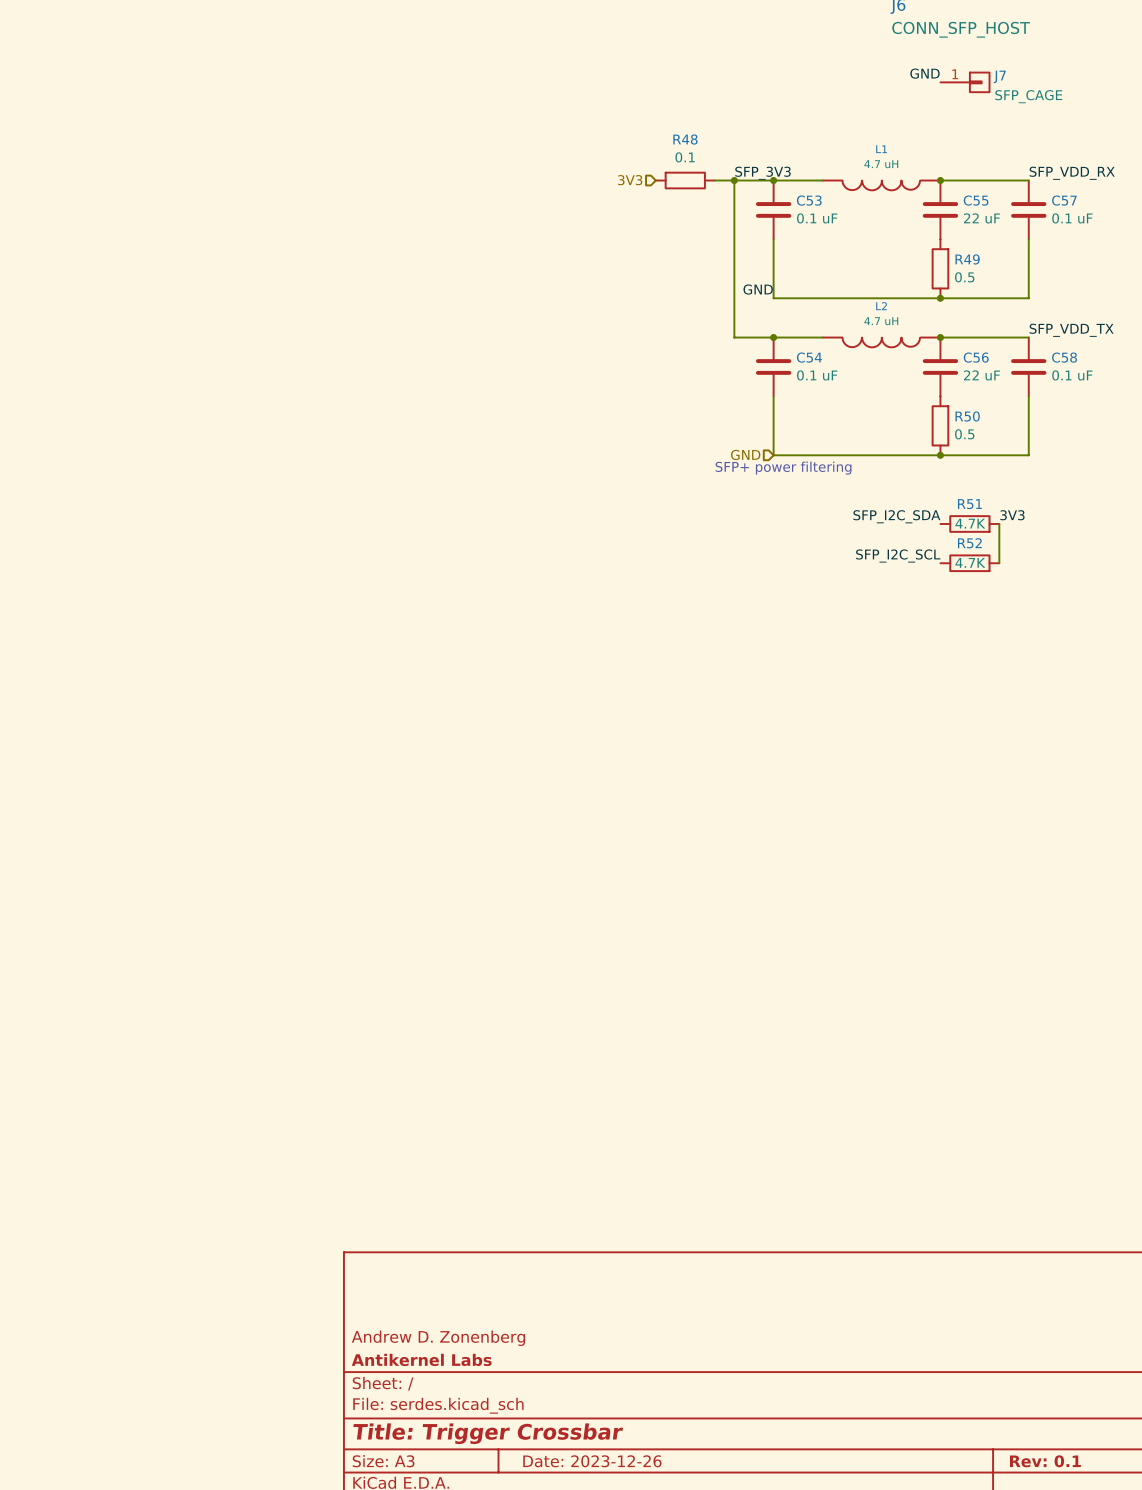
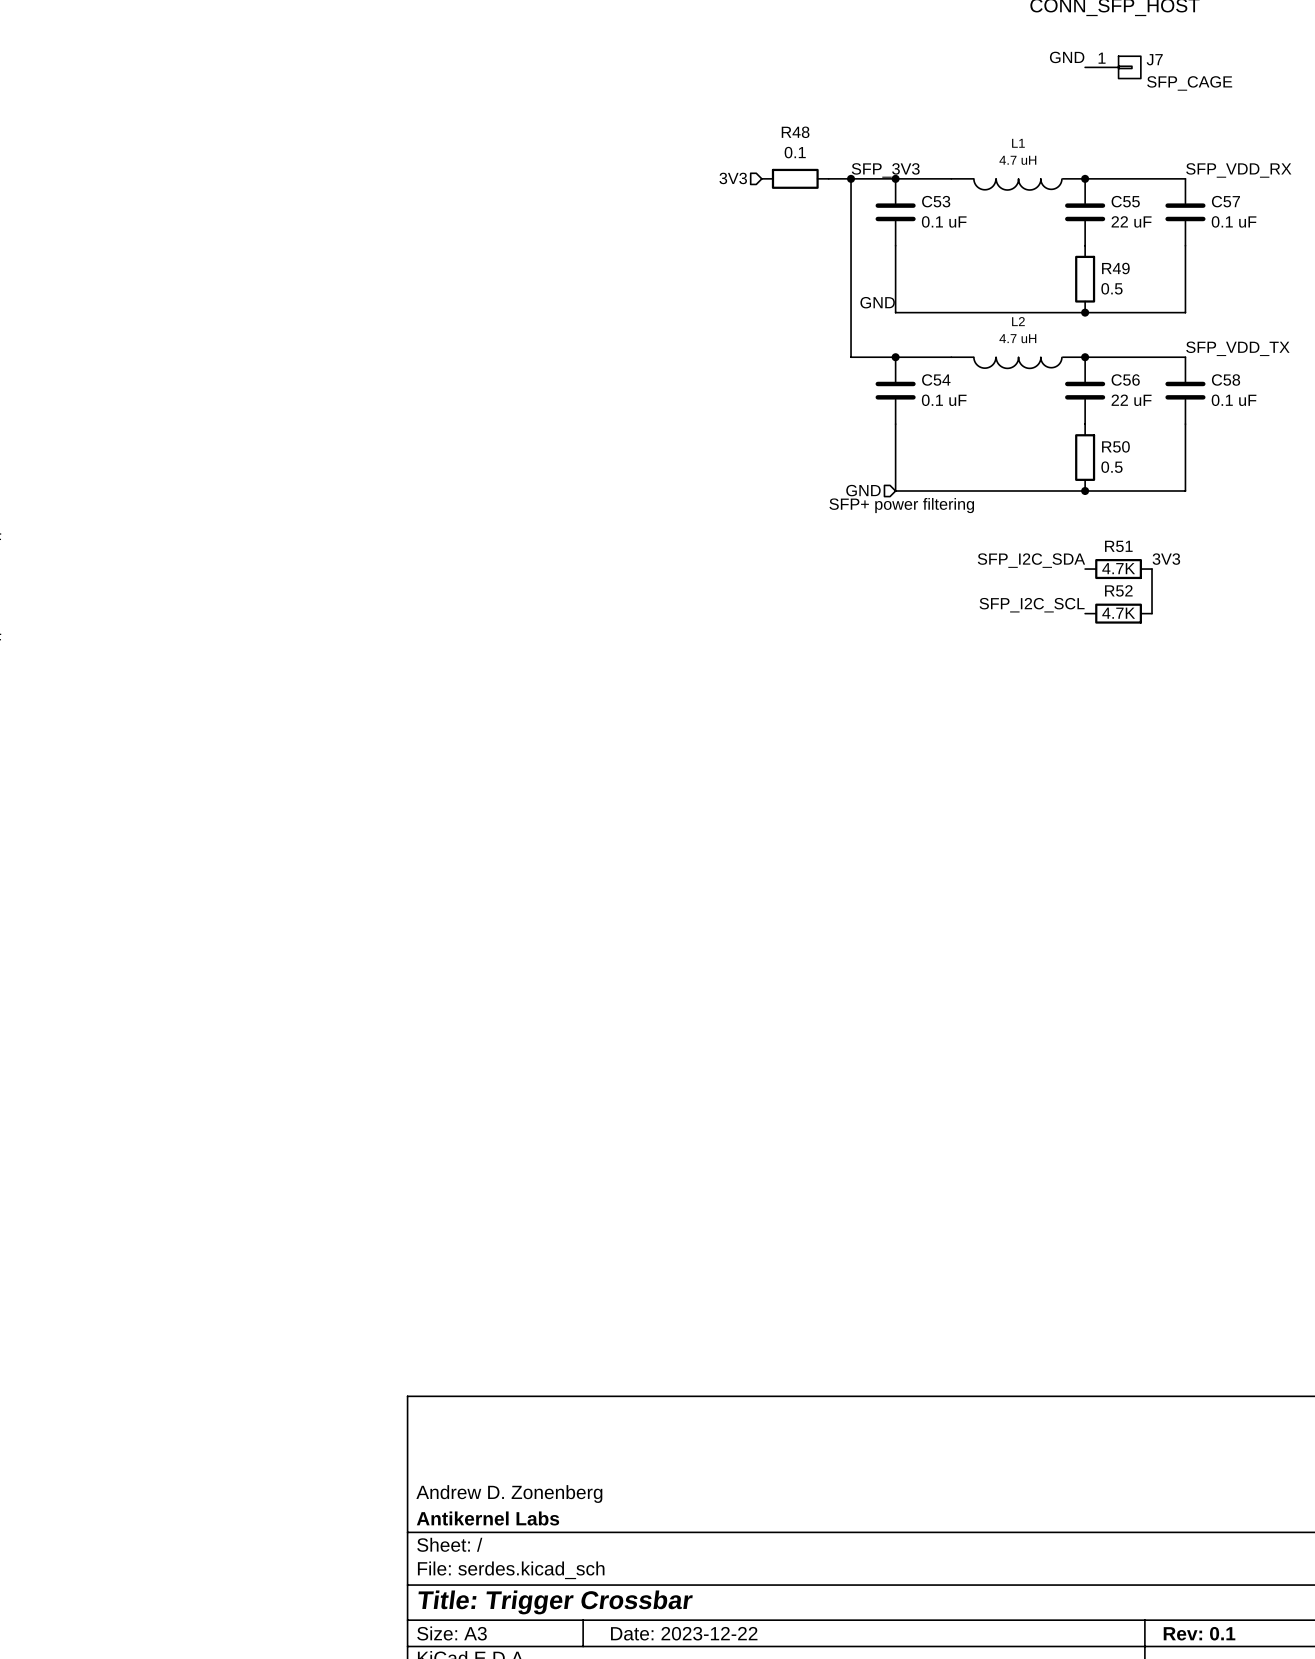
title block: Date: 2023-12-26 (592, 1461) -> Date: 2023-12-22 (684, 1633)

